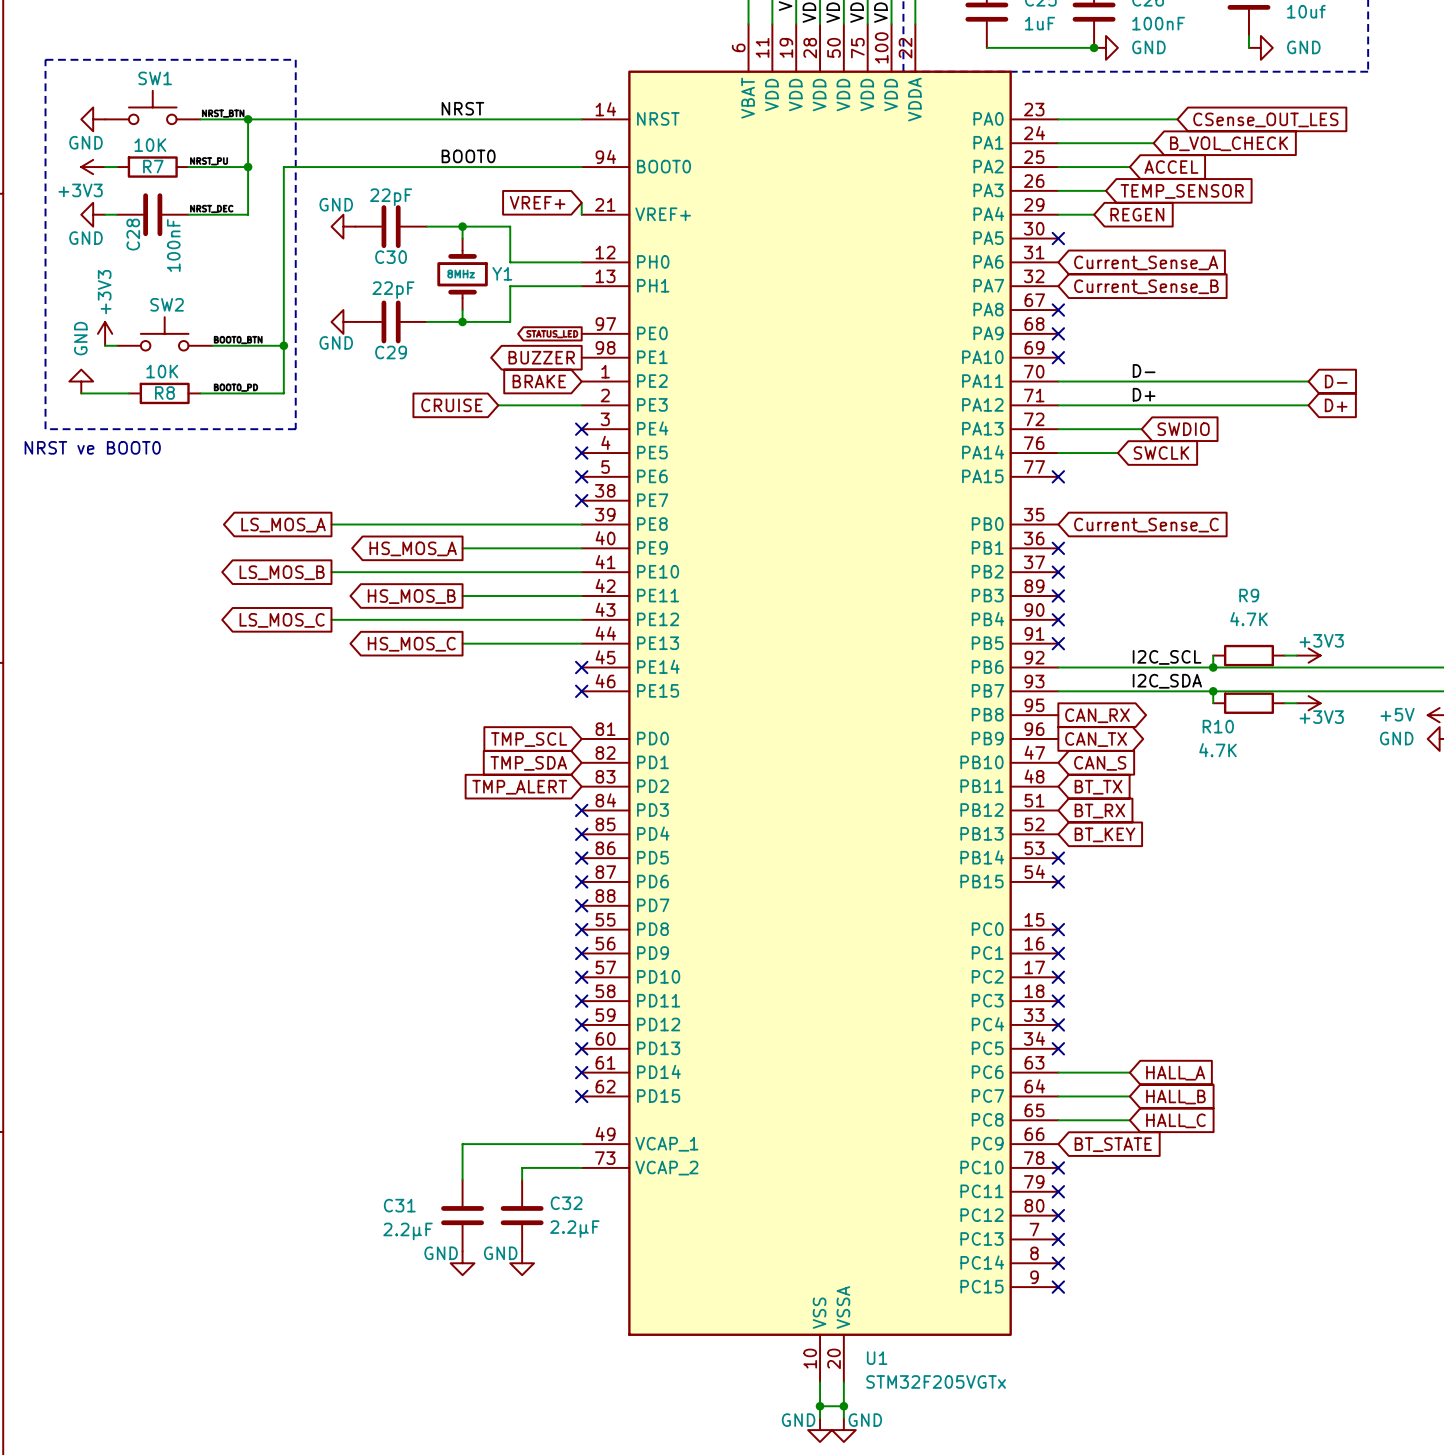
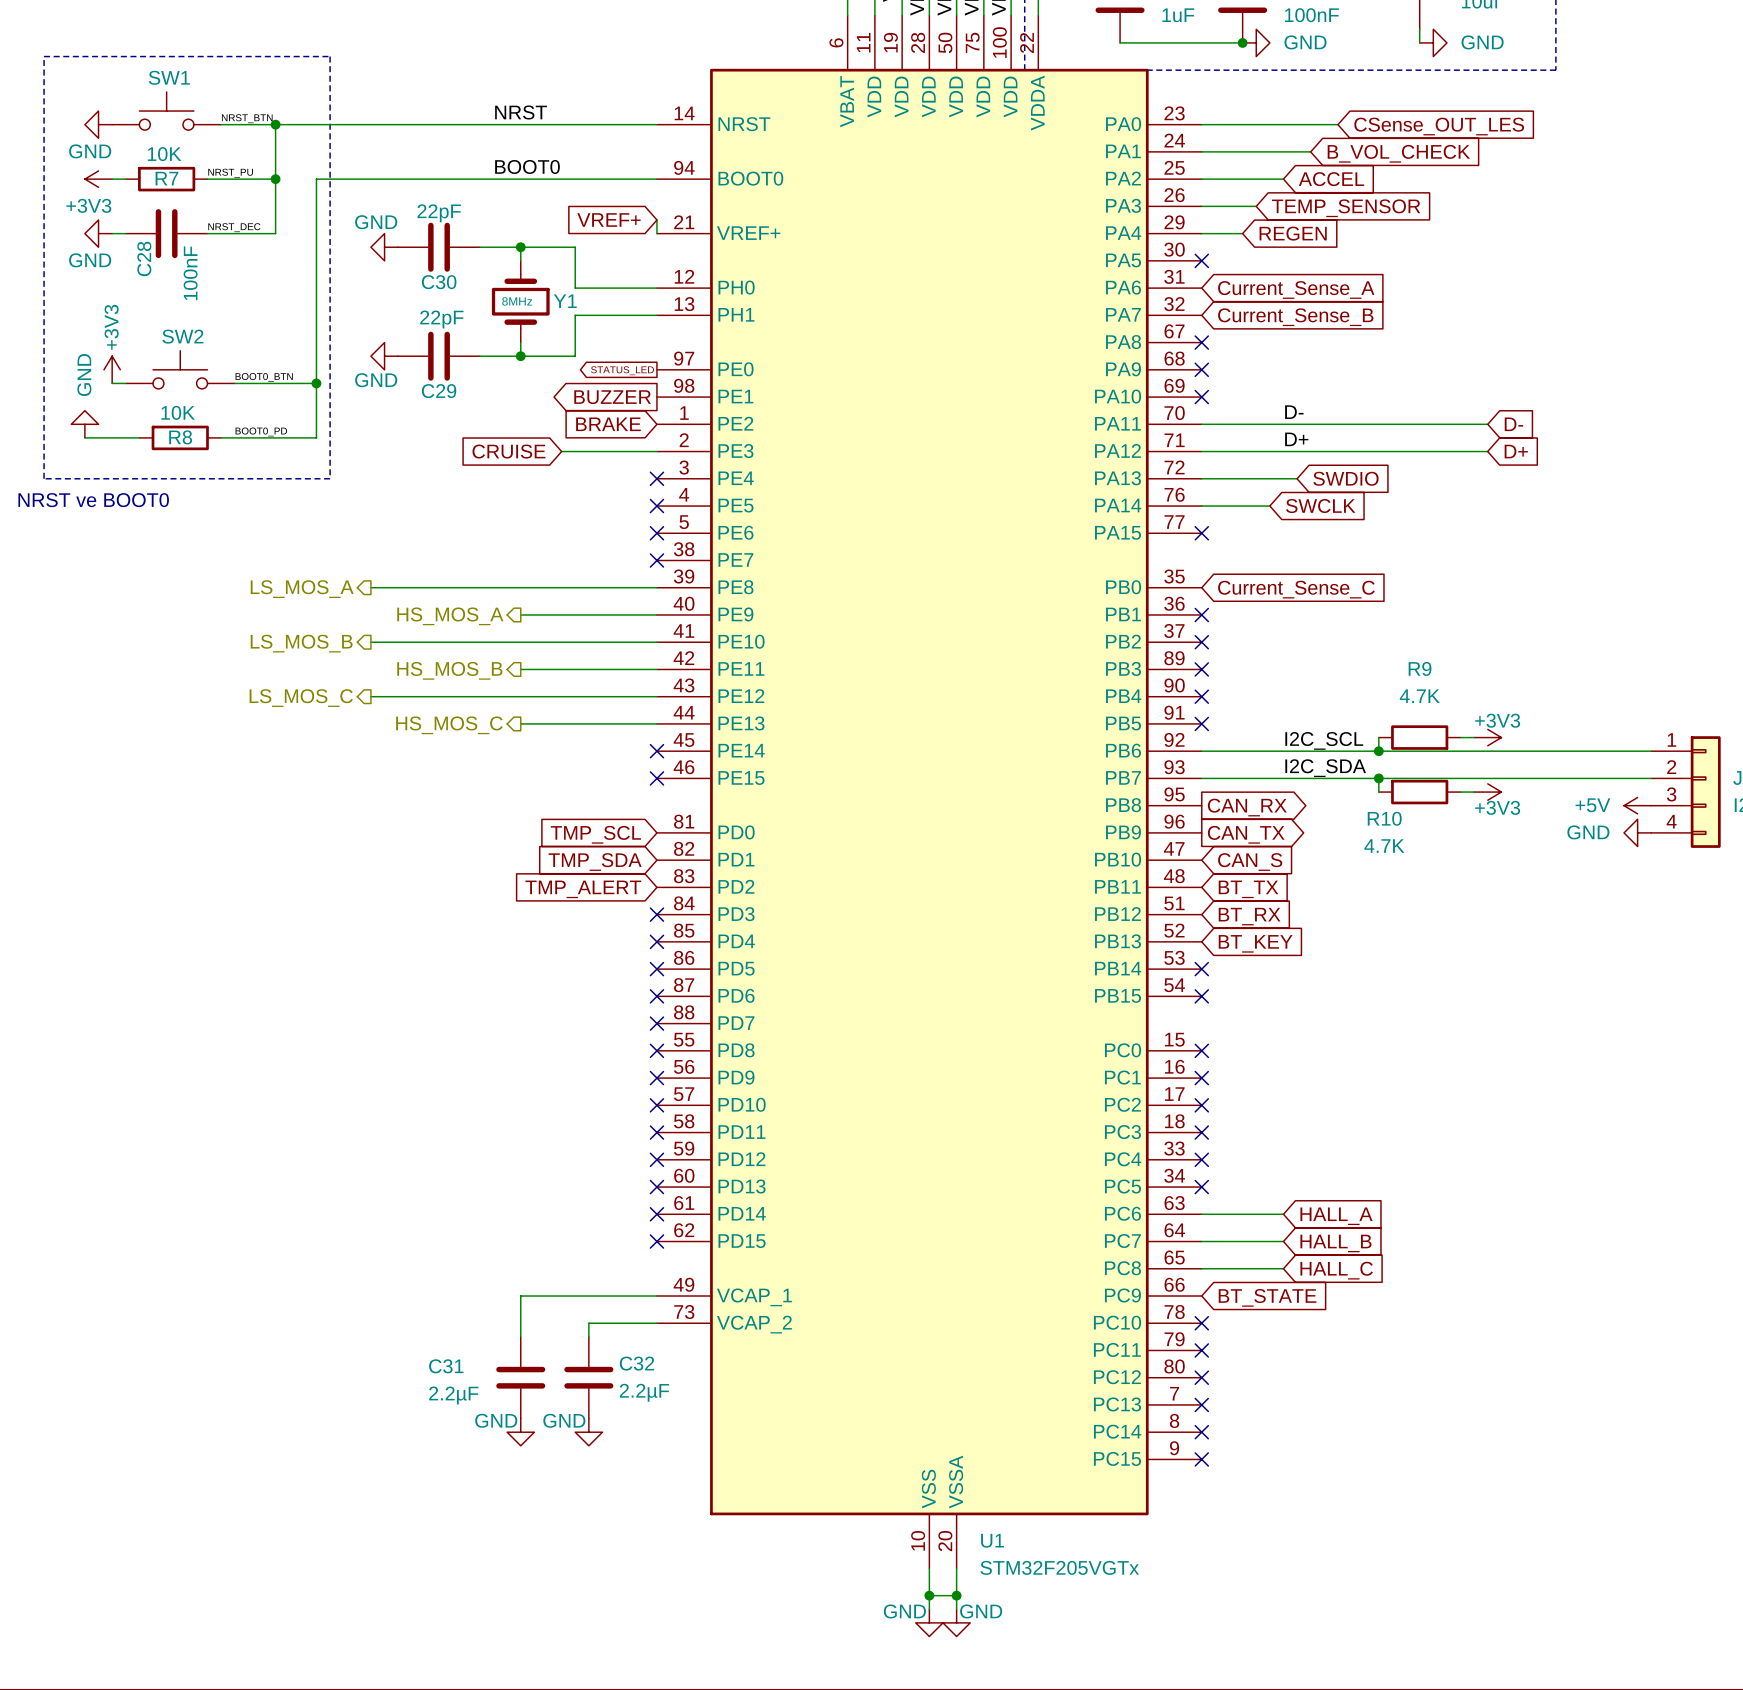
hierarchical label: none -> LS_MOS_A (302, 589)
global label: LS_MOS_A (283, 525) -> none
hierarchical label: none -> HS_MOS_A (450, 616)
global label: HS_MOS_A (413, 548) -> none
hierarchical label: none -> LS_MOS_B (301, 643)
global label: LS_MOS_B (282, 572) -> none
hierarchical label: none -> HS_MOS_B (449, 670)
global label: HS_MOS_B (411, 596) -> none
hierarchical label: none -> LS_MOS_C (301, 698)
global label: LS_MOS_C (282, 620) -> none
hierarchical label: none -> HS_MOS_C (449, 725)
global label: HS_MOS_C (411, 644) -> none

